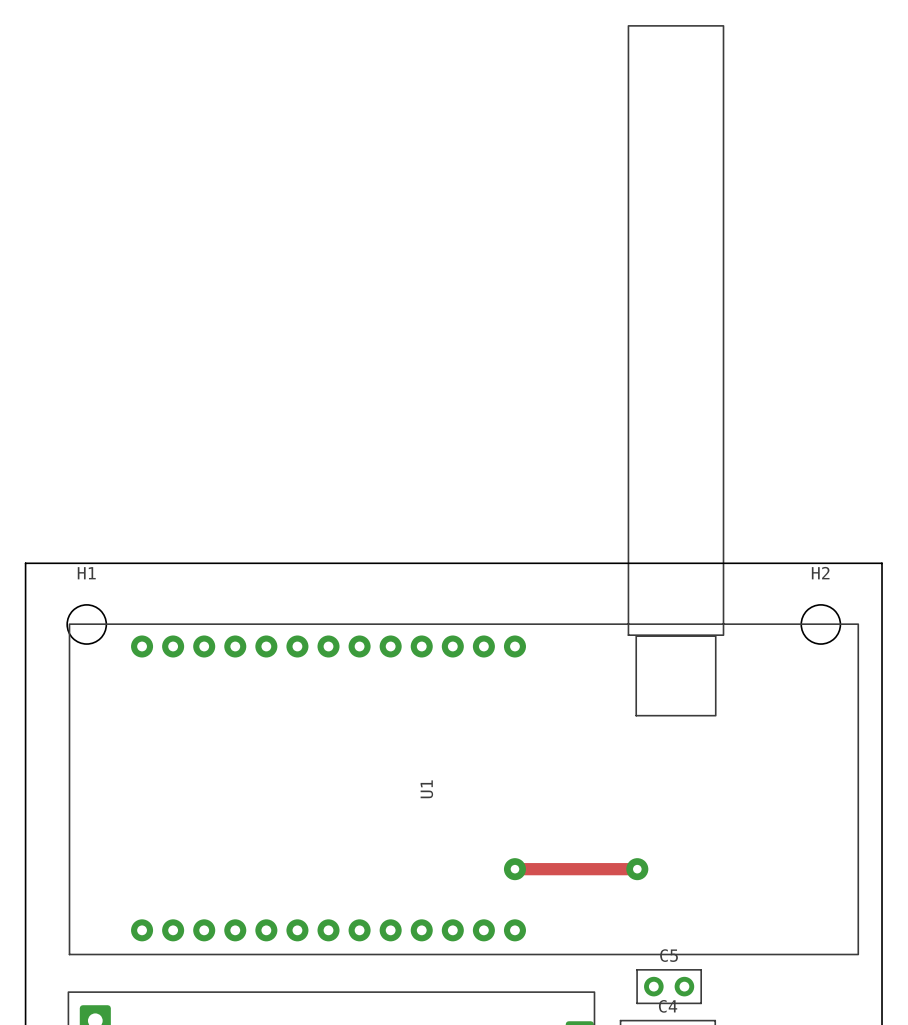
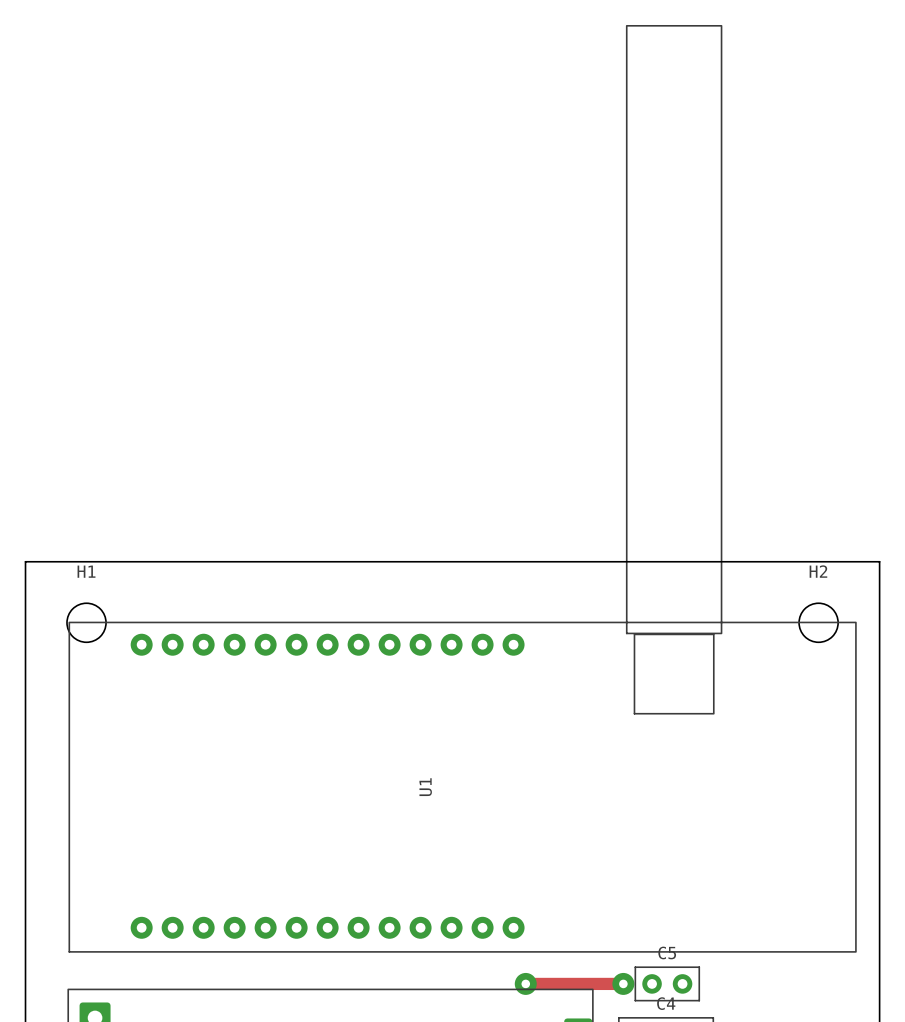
track: (514, 869) (637, 869) -> none
via: (514, 869) -> none
via: (637, 869) -> none
track: none -> (525, 983) (623, 983)
via: none -> (525, 983)
via: none -> (623, 983)

